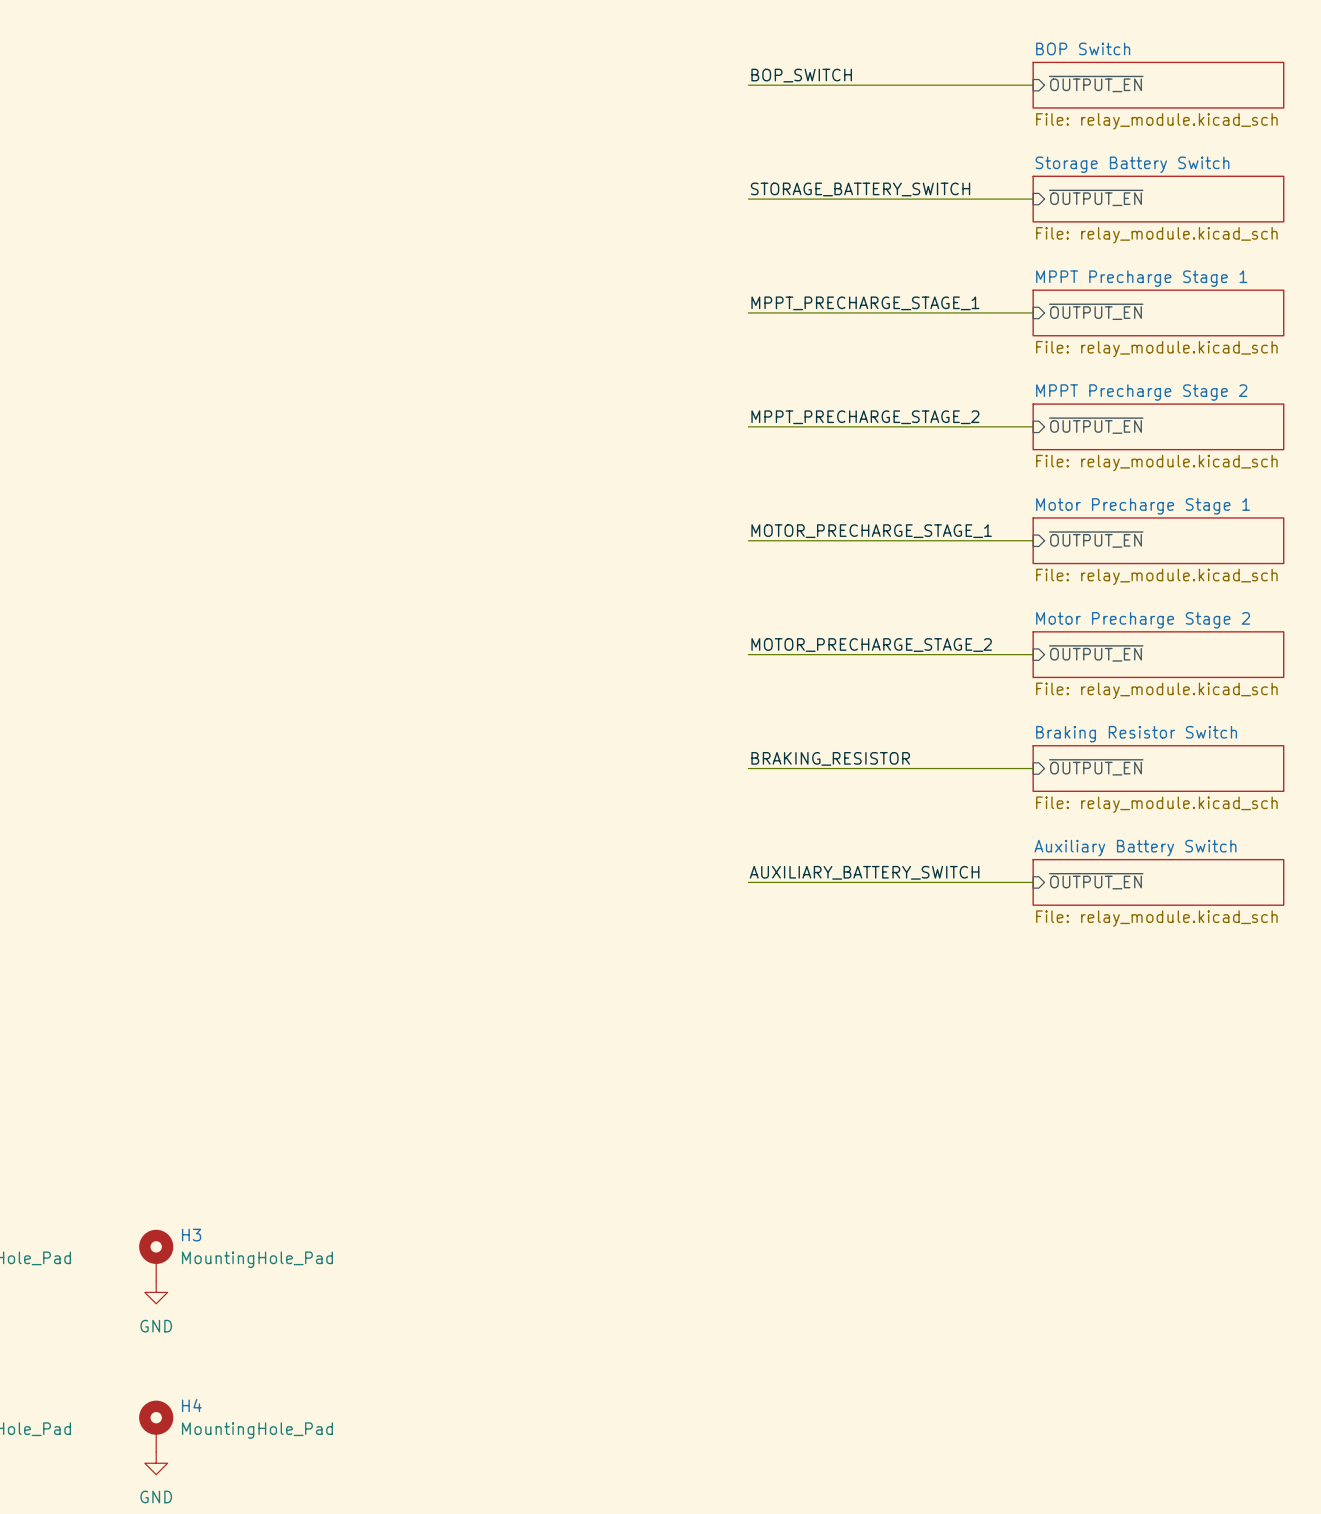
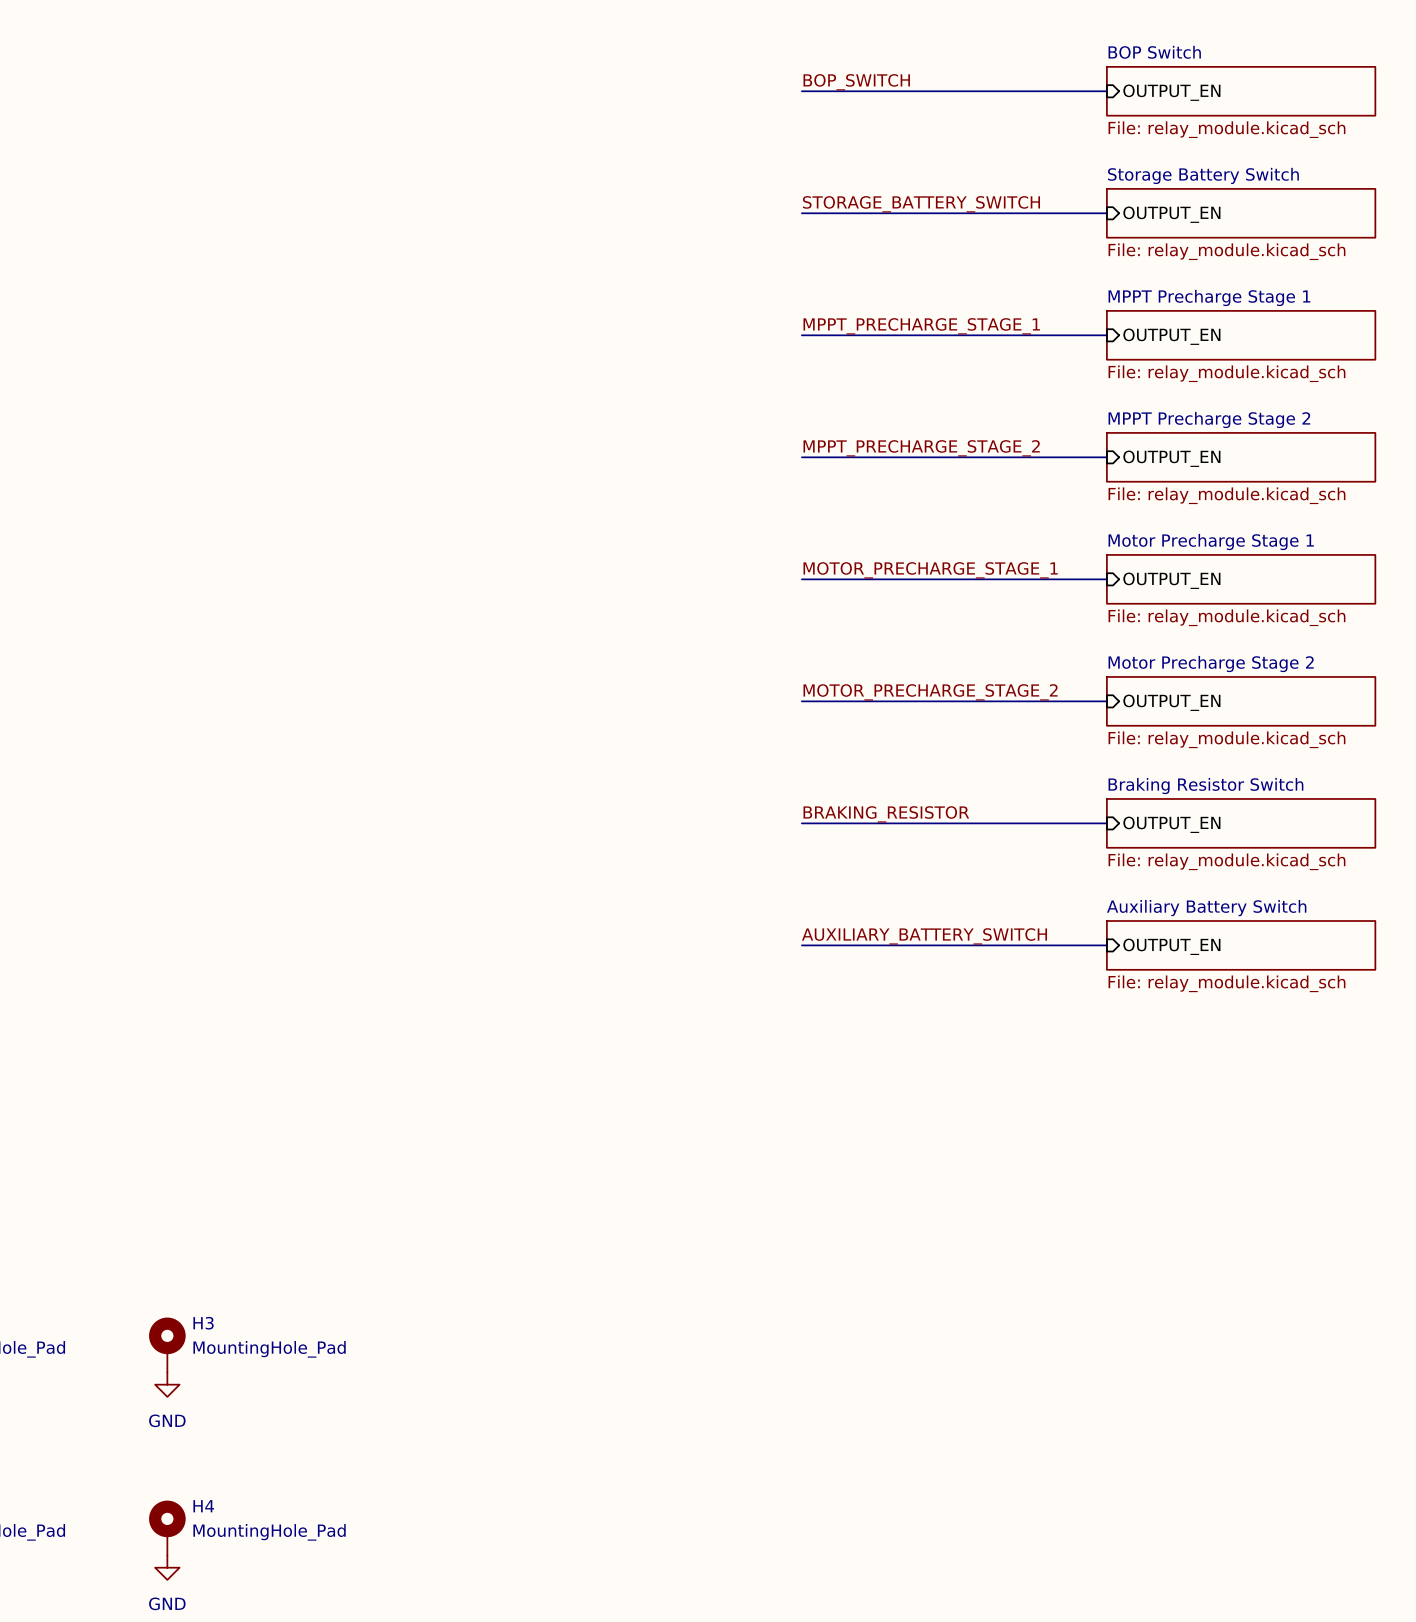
sheet pin: ~{OUTPUT_EN} (1096, 84) -> OUTPUT_EN (1171, 92)
sheet pin: ~{OUTPUT_EN} (1096, 197) -> OUTPUT_EN (1171, 214)
sheet pin: ~{OUTPUT_EN} (1096, 311) -> OUTPUT_EN (1171, 336)
sheet pin: ~{OUTPUT_EN} (1096, 425) -> OUTPUT_EN (1171, 458)
sheet pin: ~{OUTPUT_EN} (1096, 539) -> OUTPUT_EN (1171, 580)
sheet pin: ~{OUTPUT_EN} (1096, 653) -> OUTPUT_EN (1171, 702)
sheet pin: ~{OUTPUT_EN} (1096, 767) -> OUTPUT_EN (1171, 824)
sheet pin: ~{OUTPUT_EN} (1096, 881) -> OUTPUT_EN (1171, 946)

